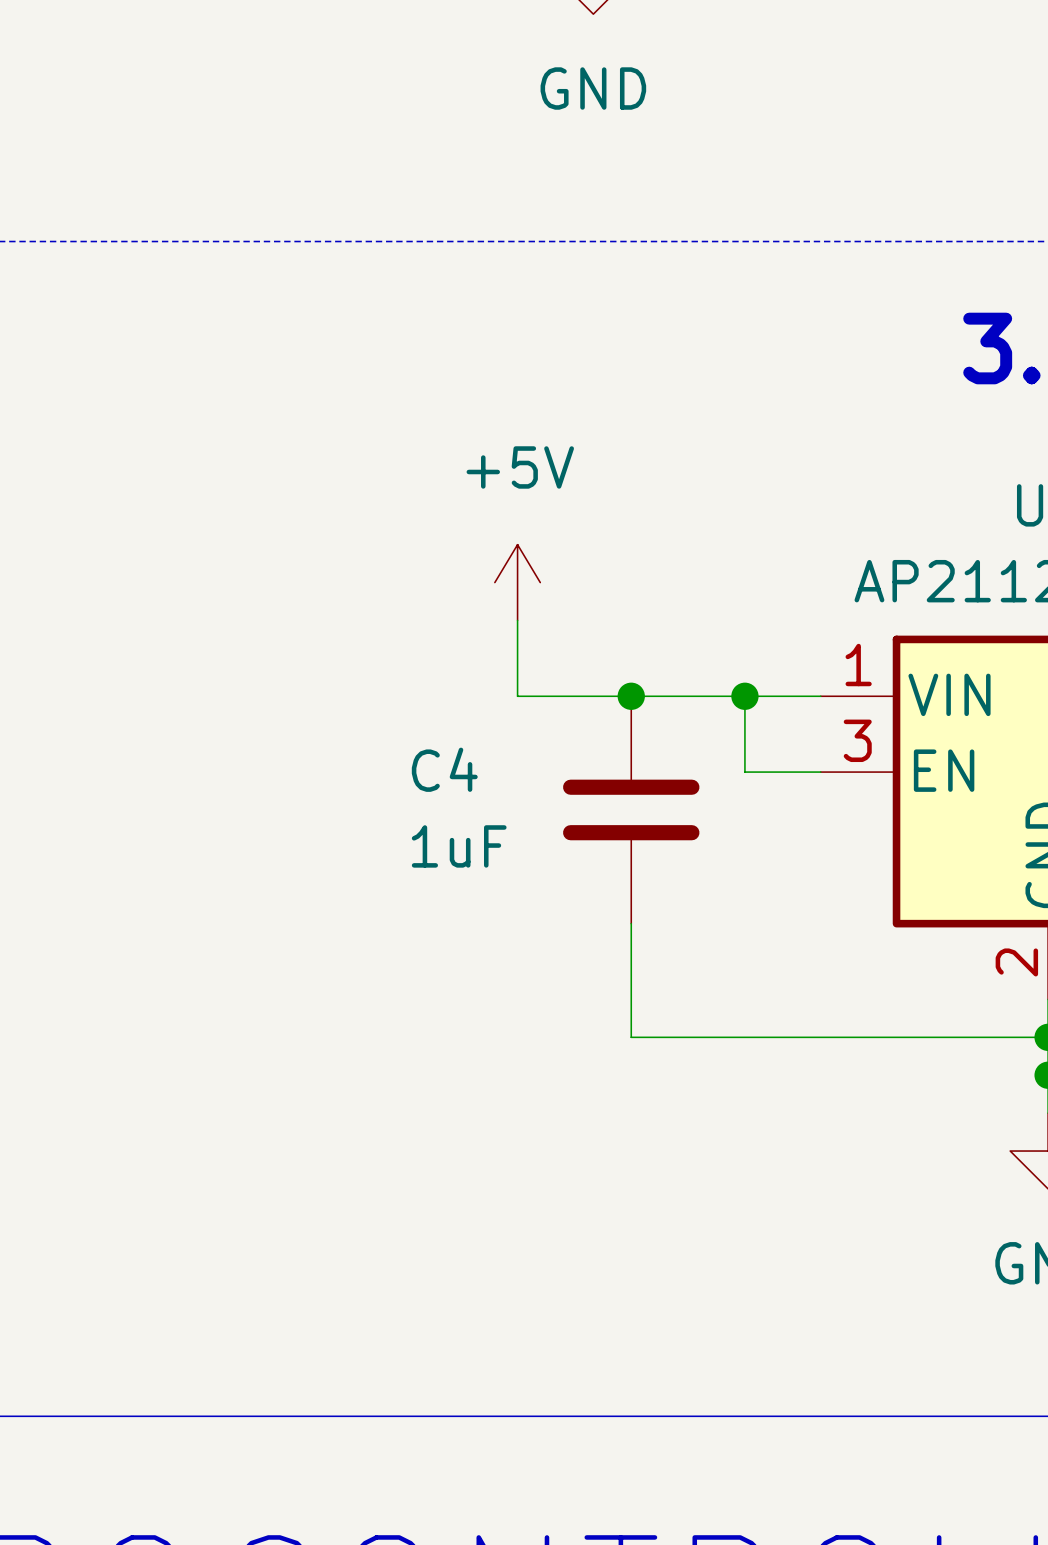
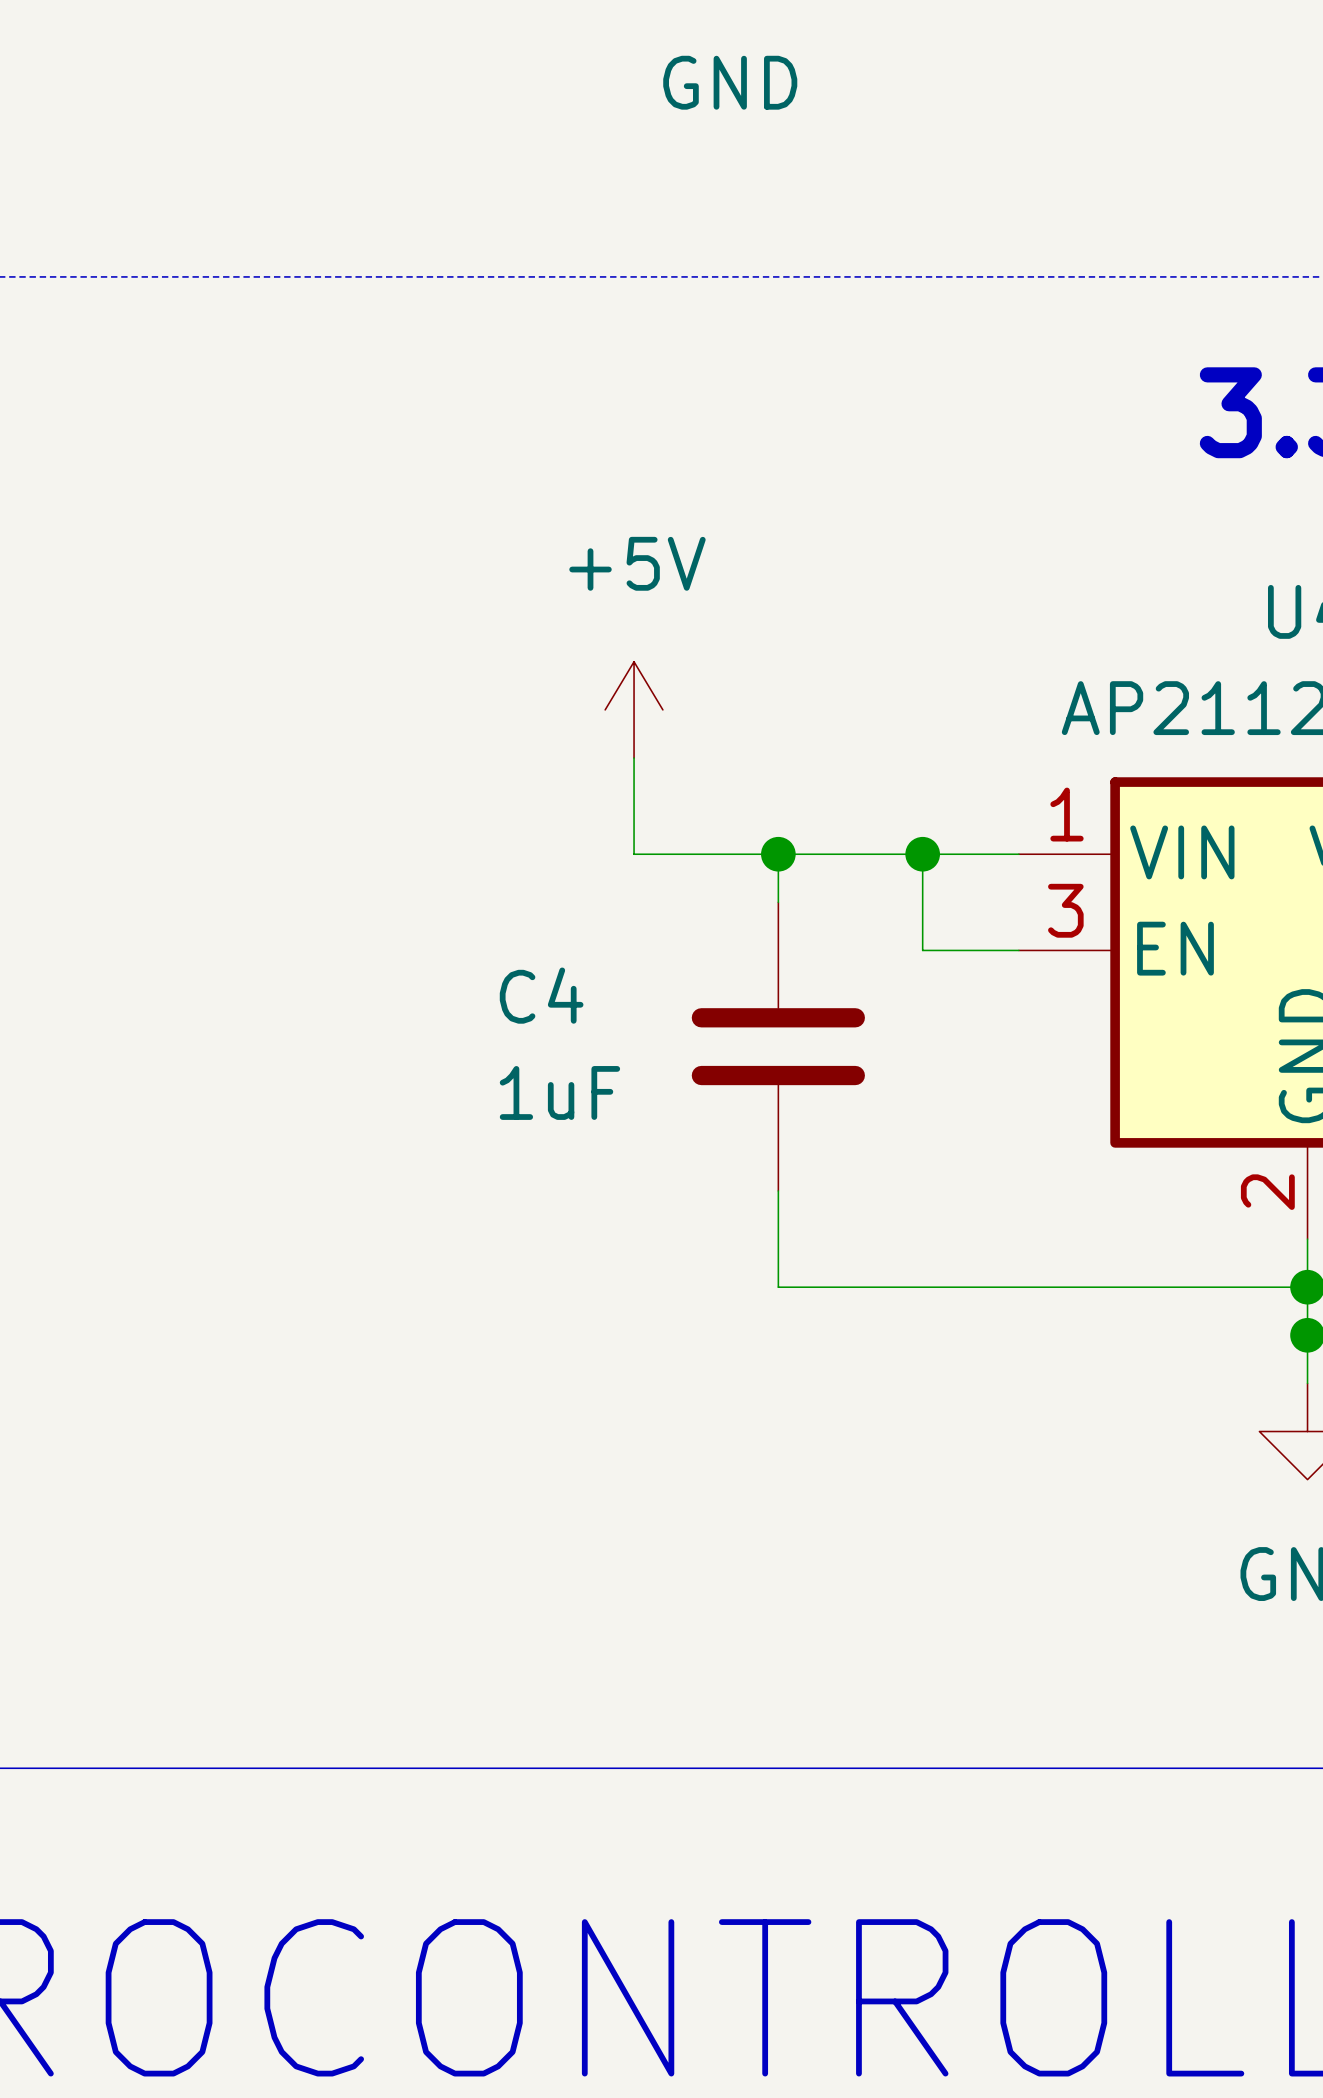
C4 position: (631, 809) -> (778, 1046)

